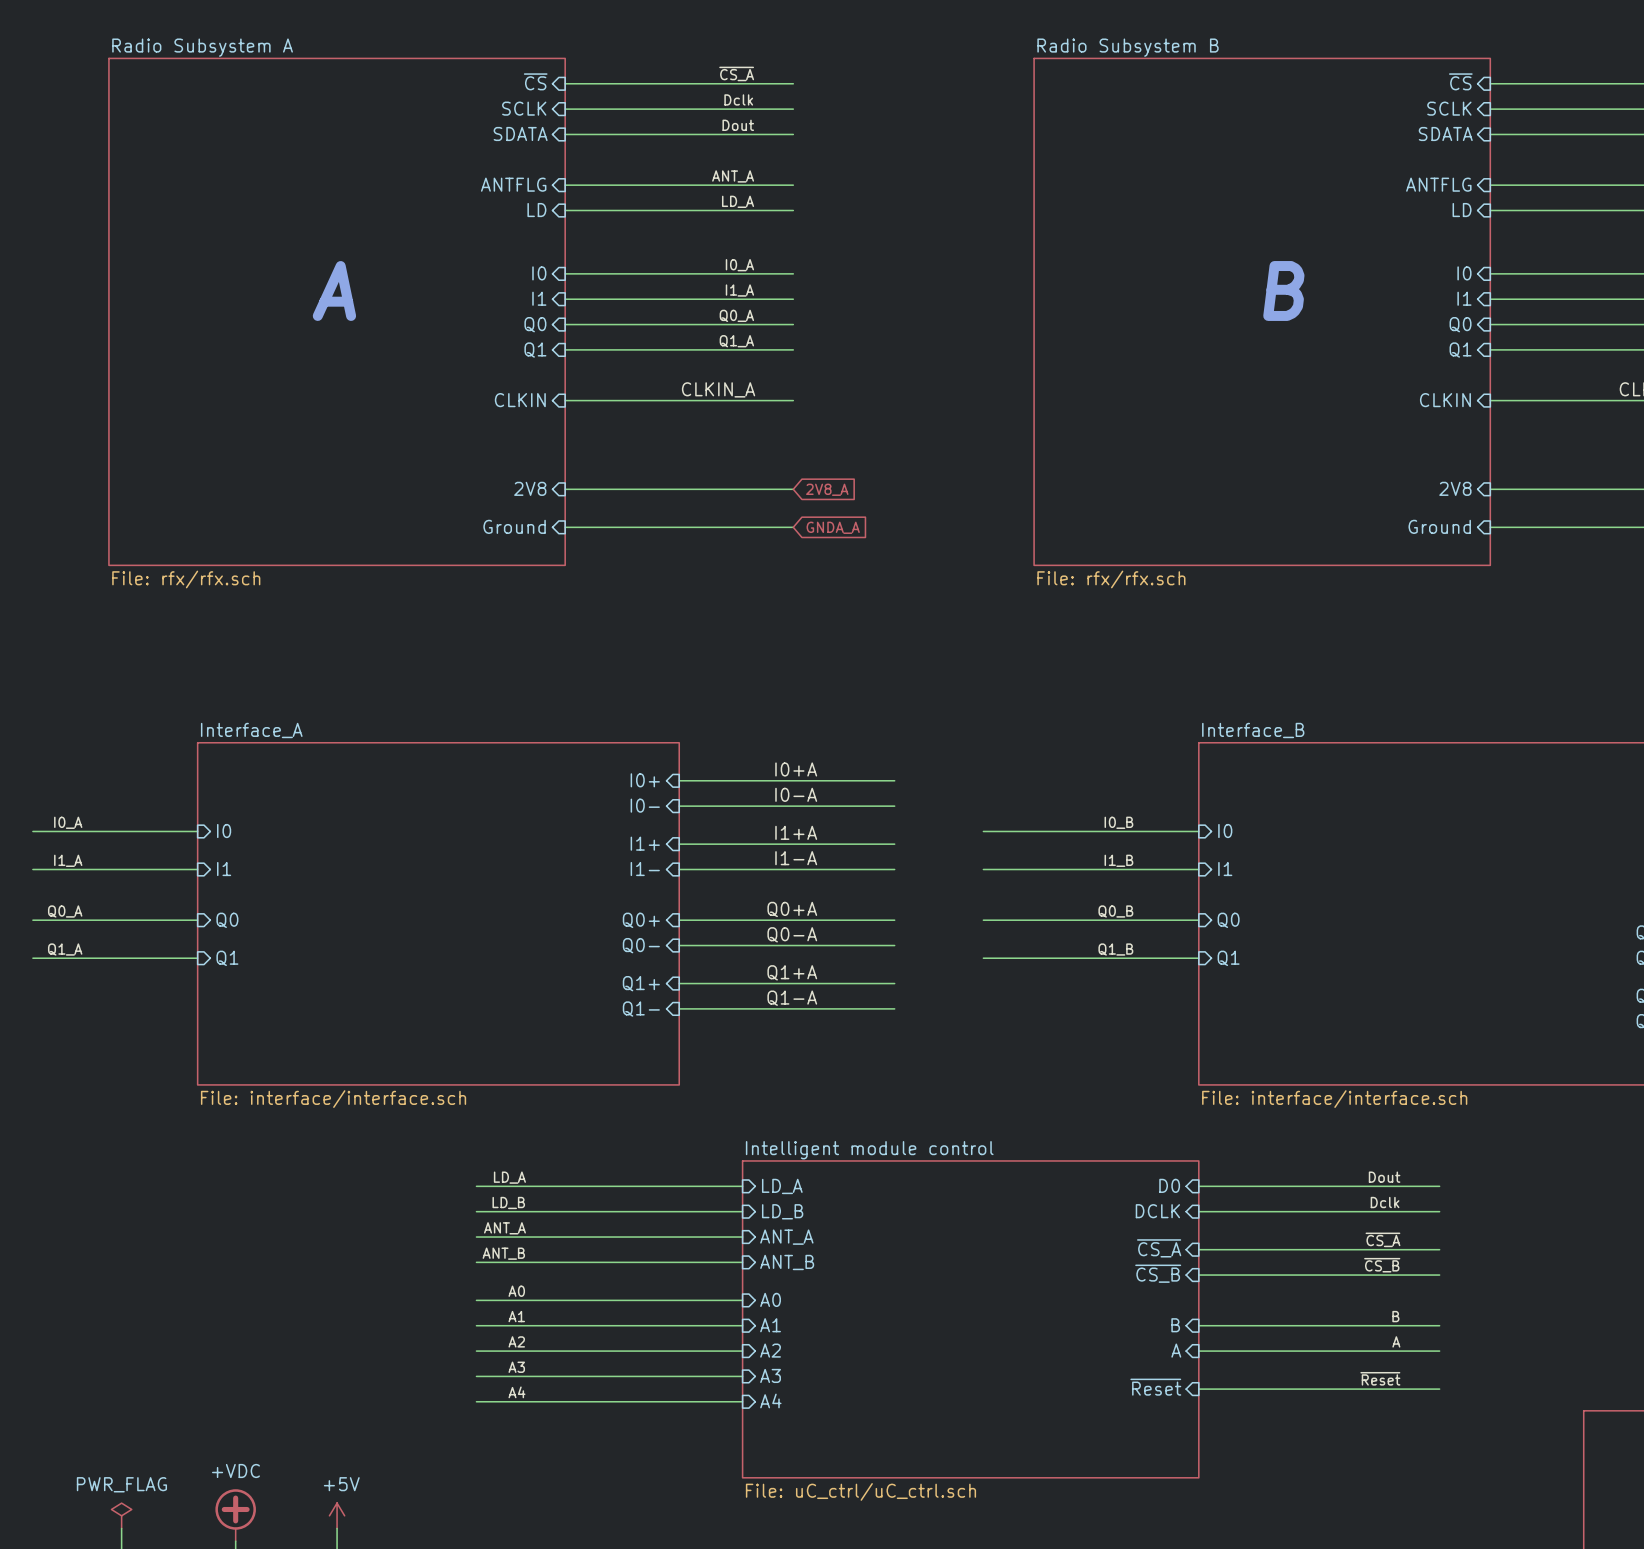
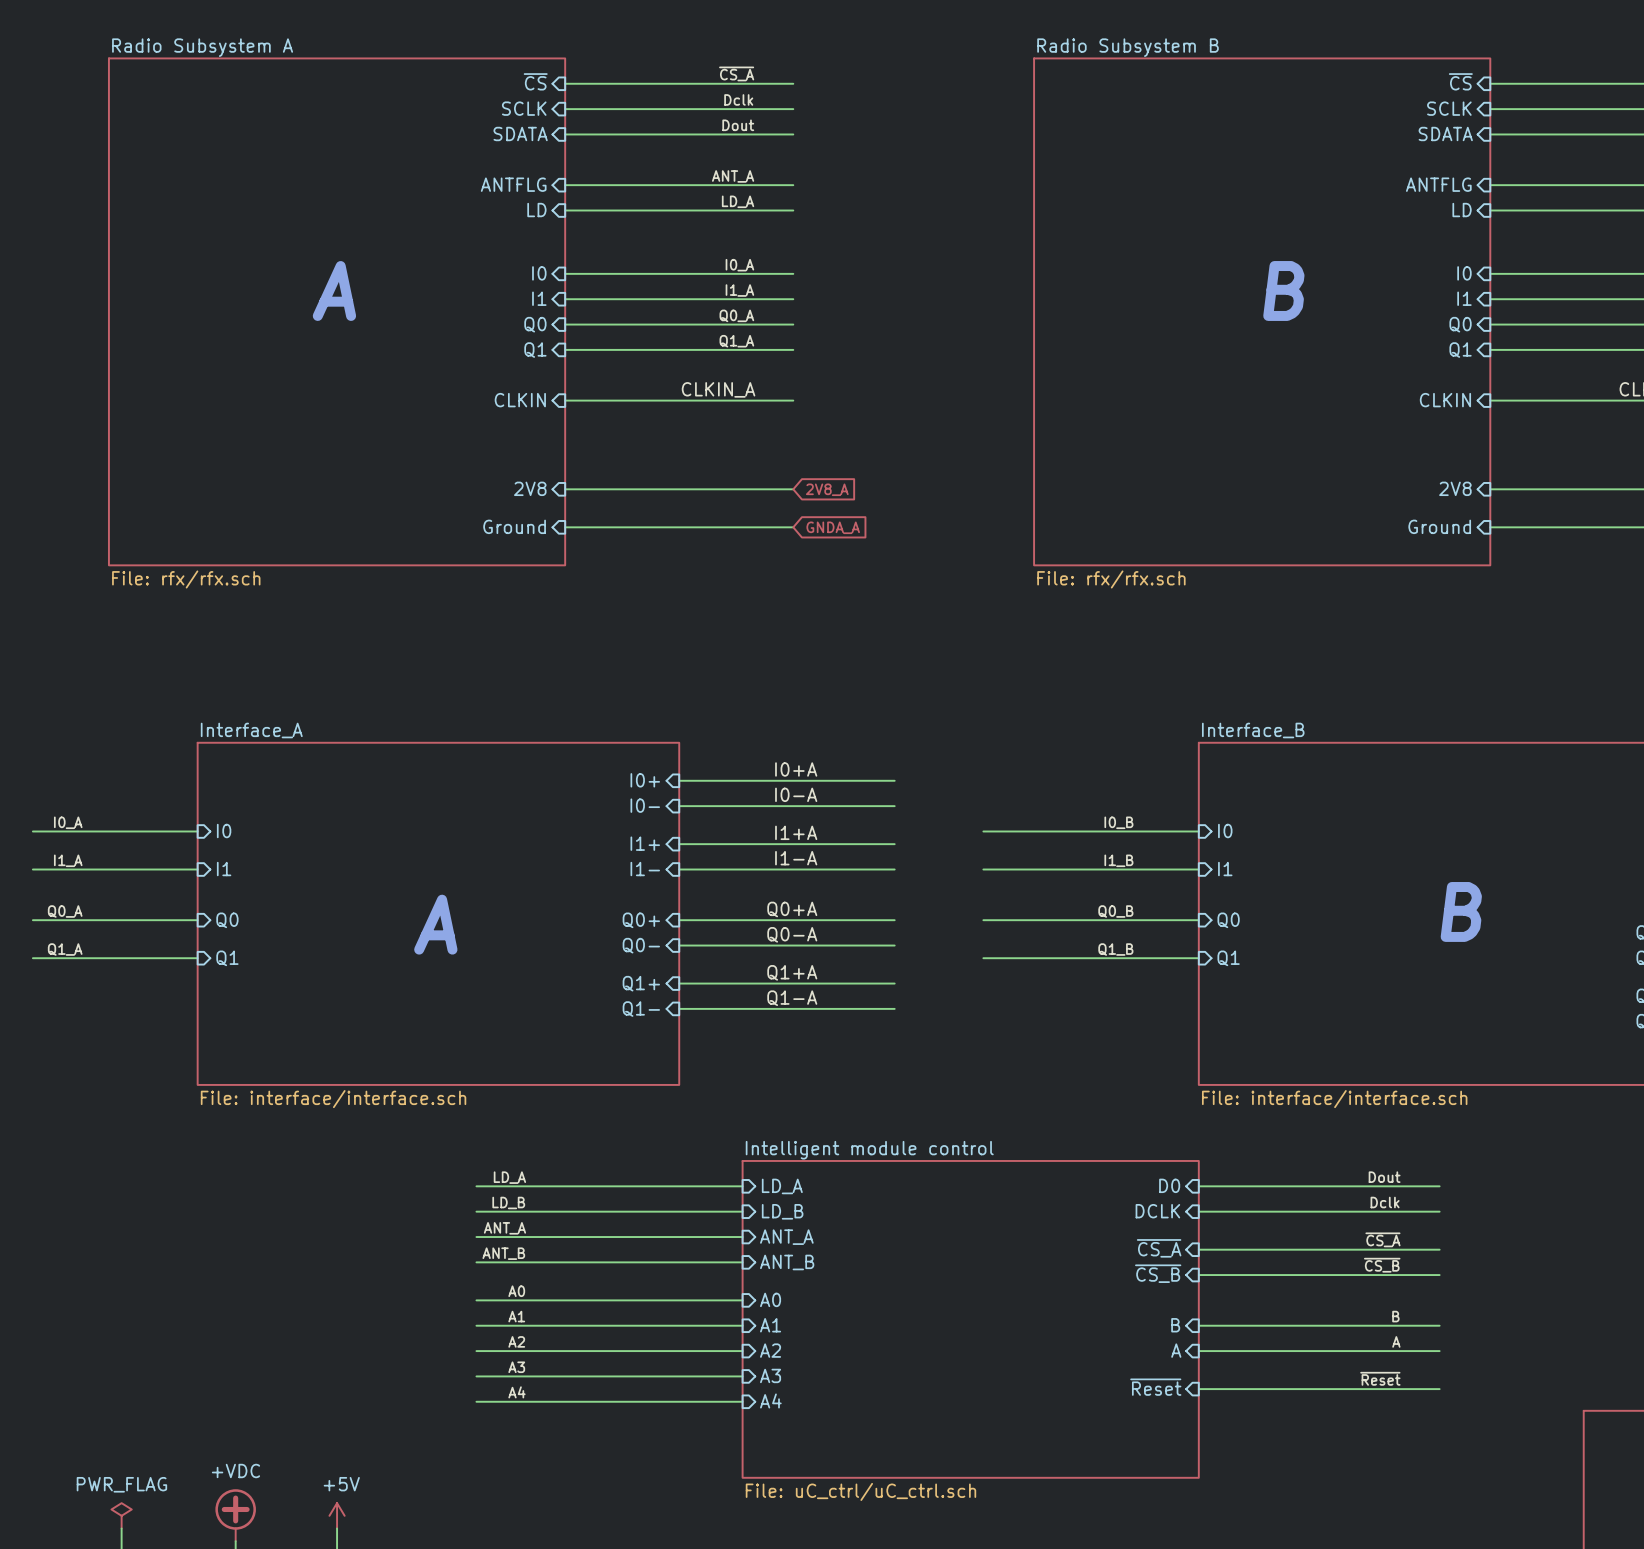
text: none -> B (1461, 911)
text: none -> A (435, 924)

